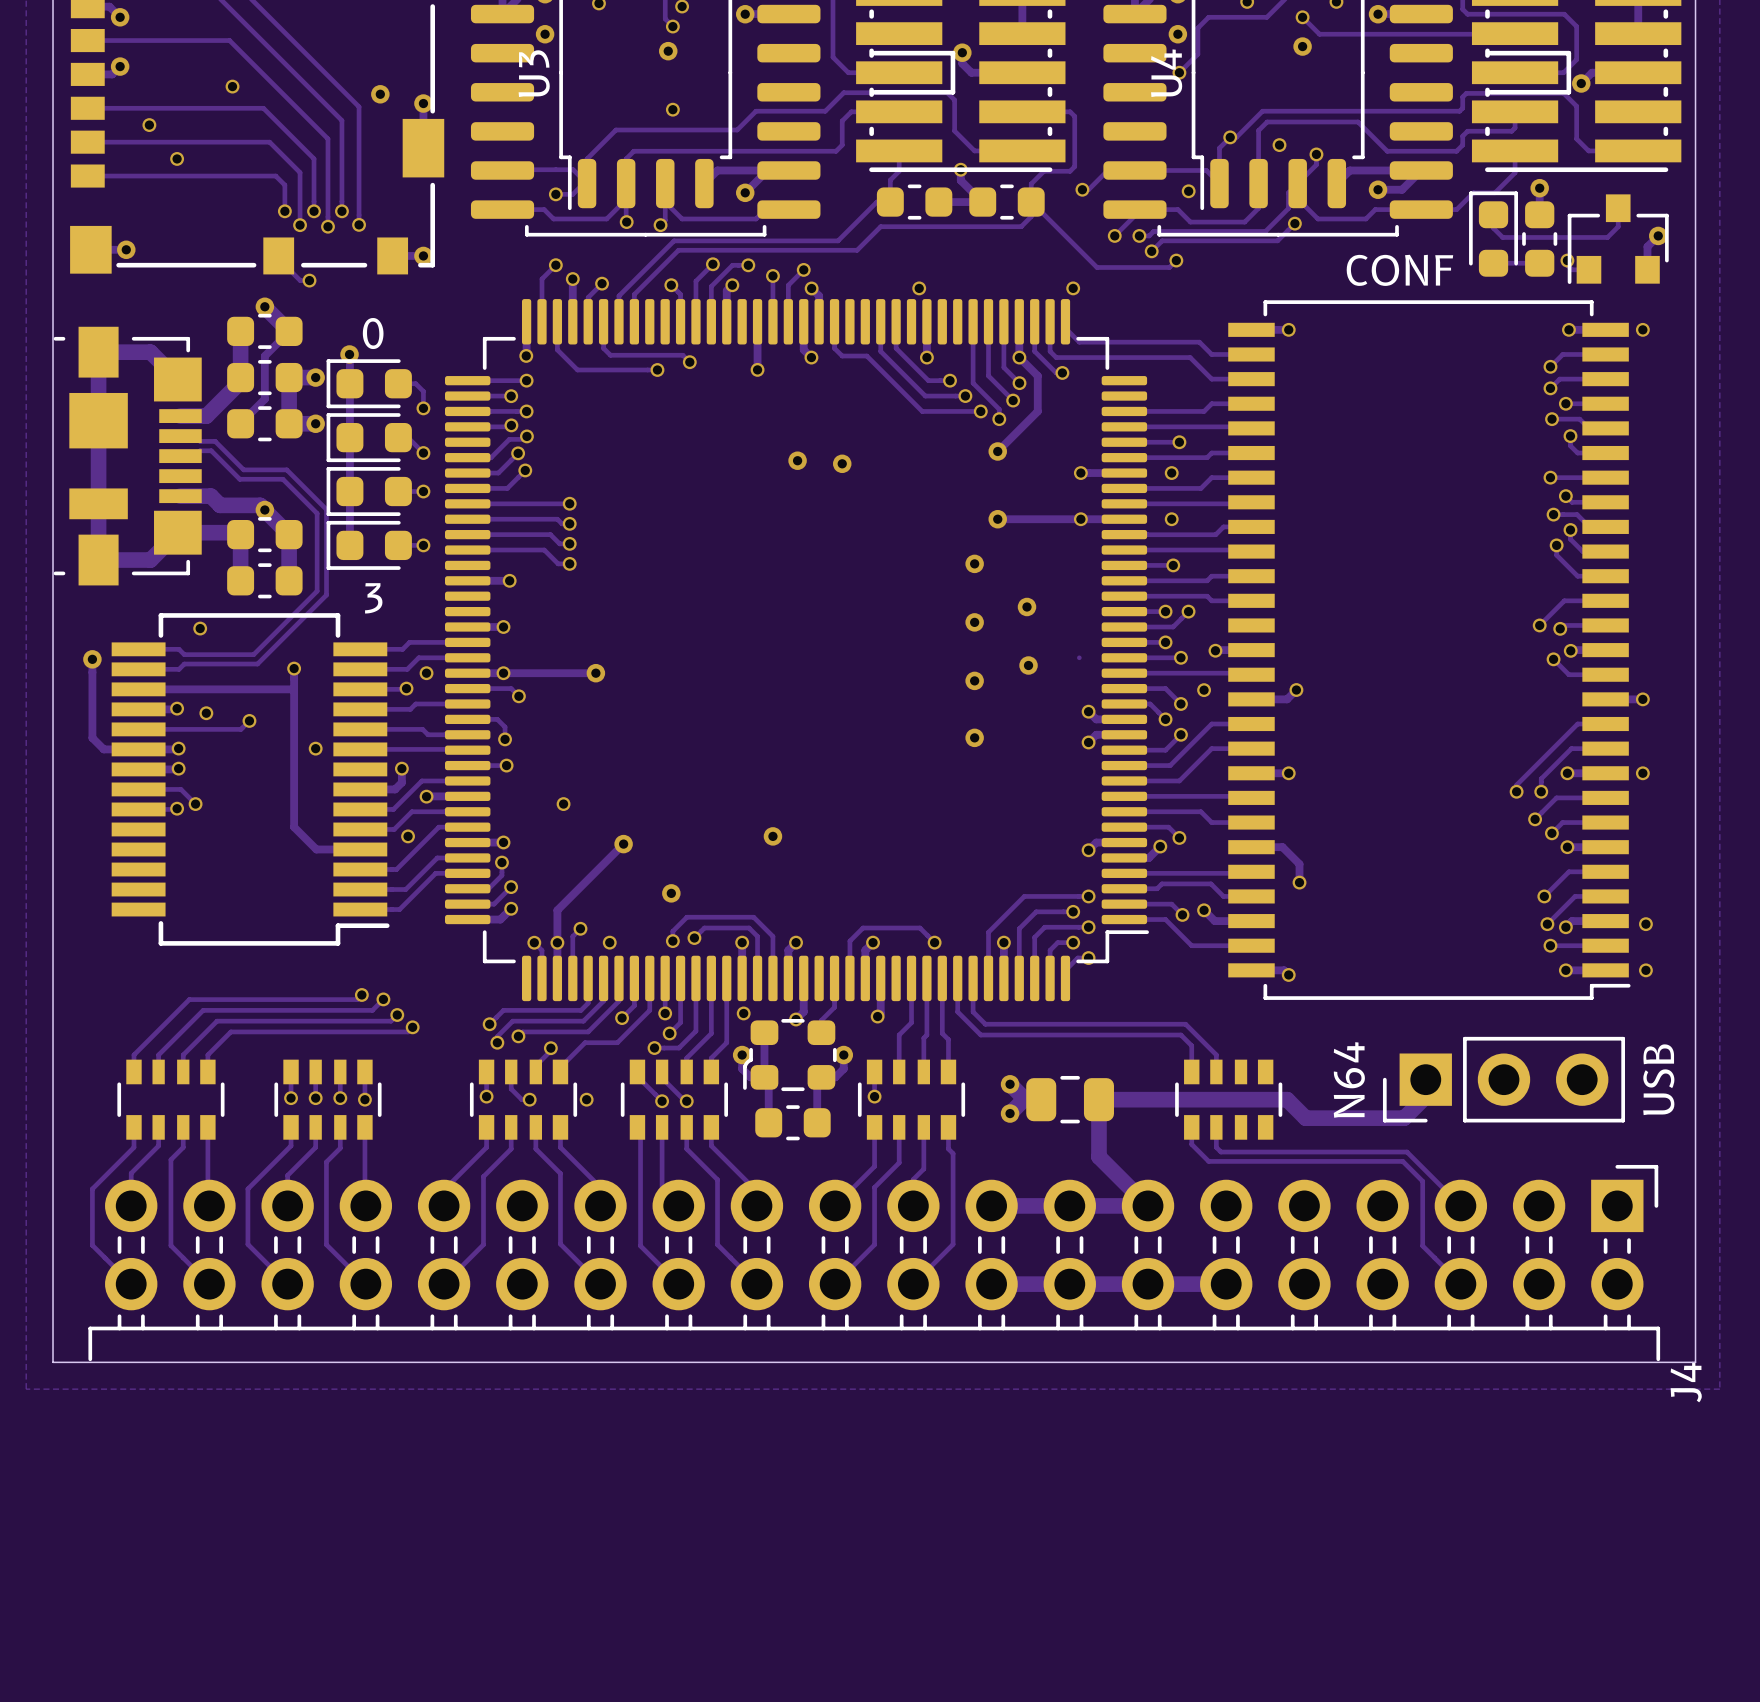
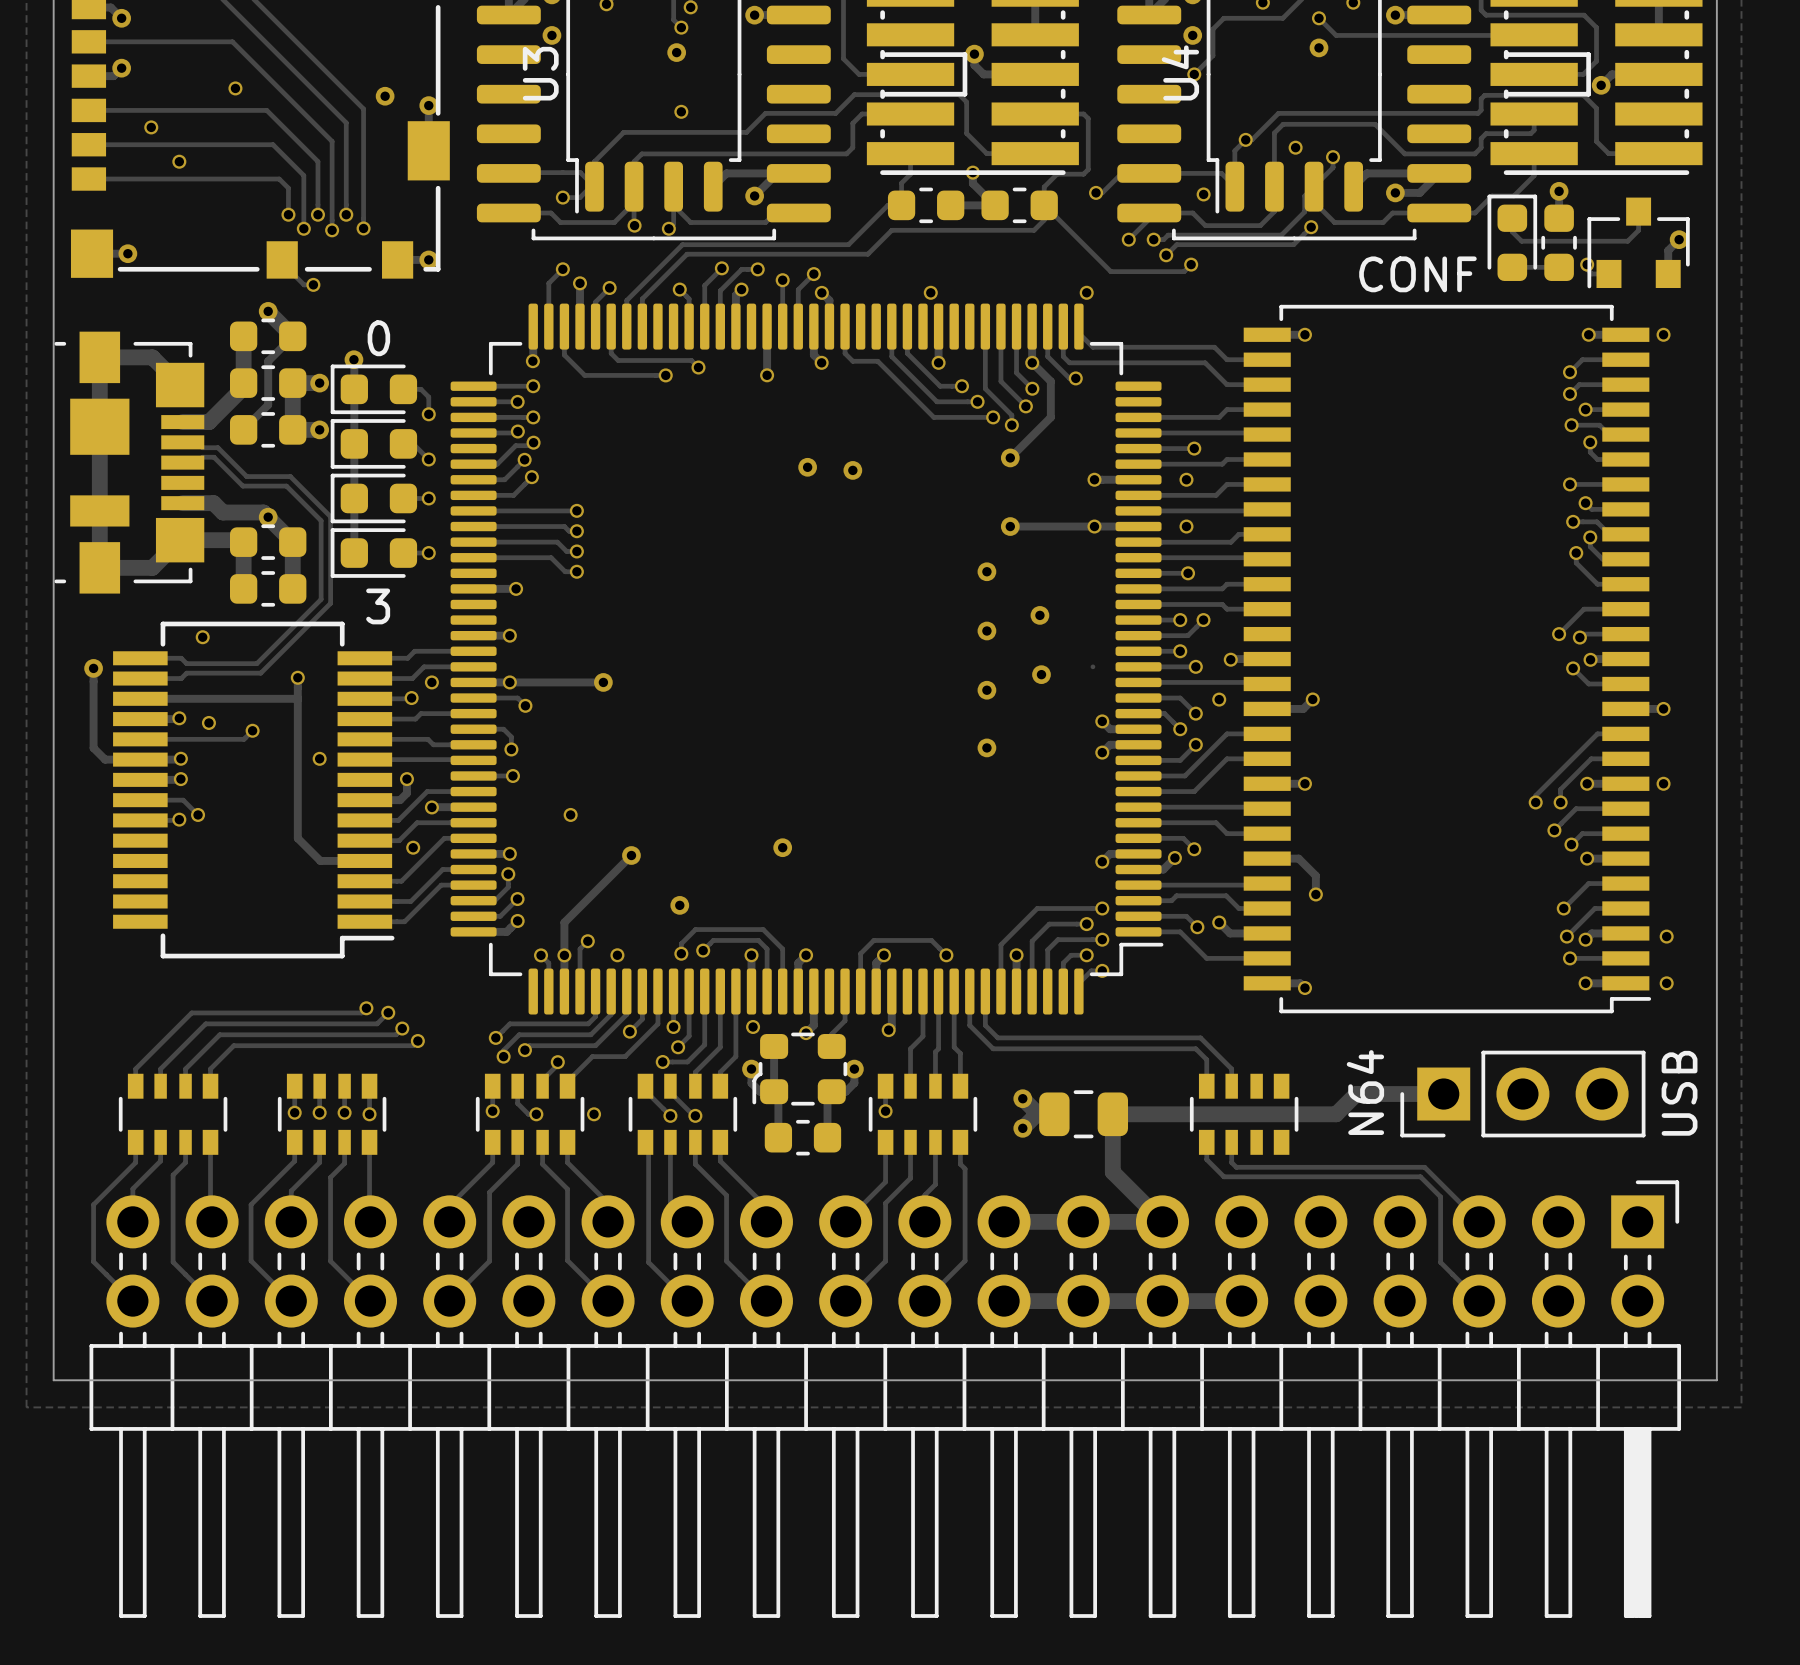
track: (1425, 1079) (1425, 1096) (1404, 1118) (1305, 1118) (1287, 1099) -> (1443, 1094) (1356, 1094) (1336, 1114) (1303, 1114)
J4: (874, 1263) -> none
part: none -> (885, 1399)

